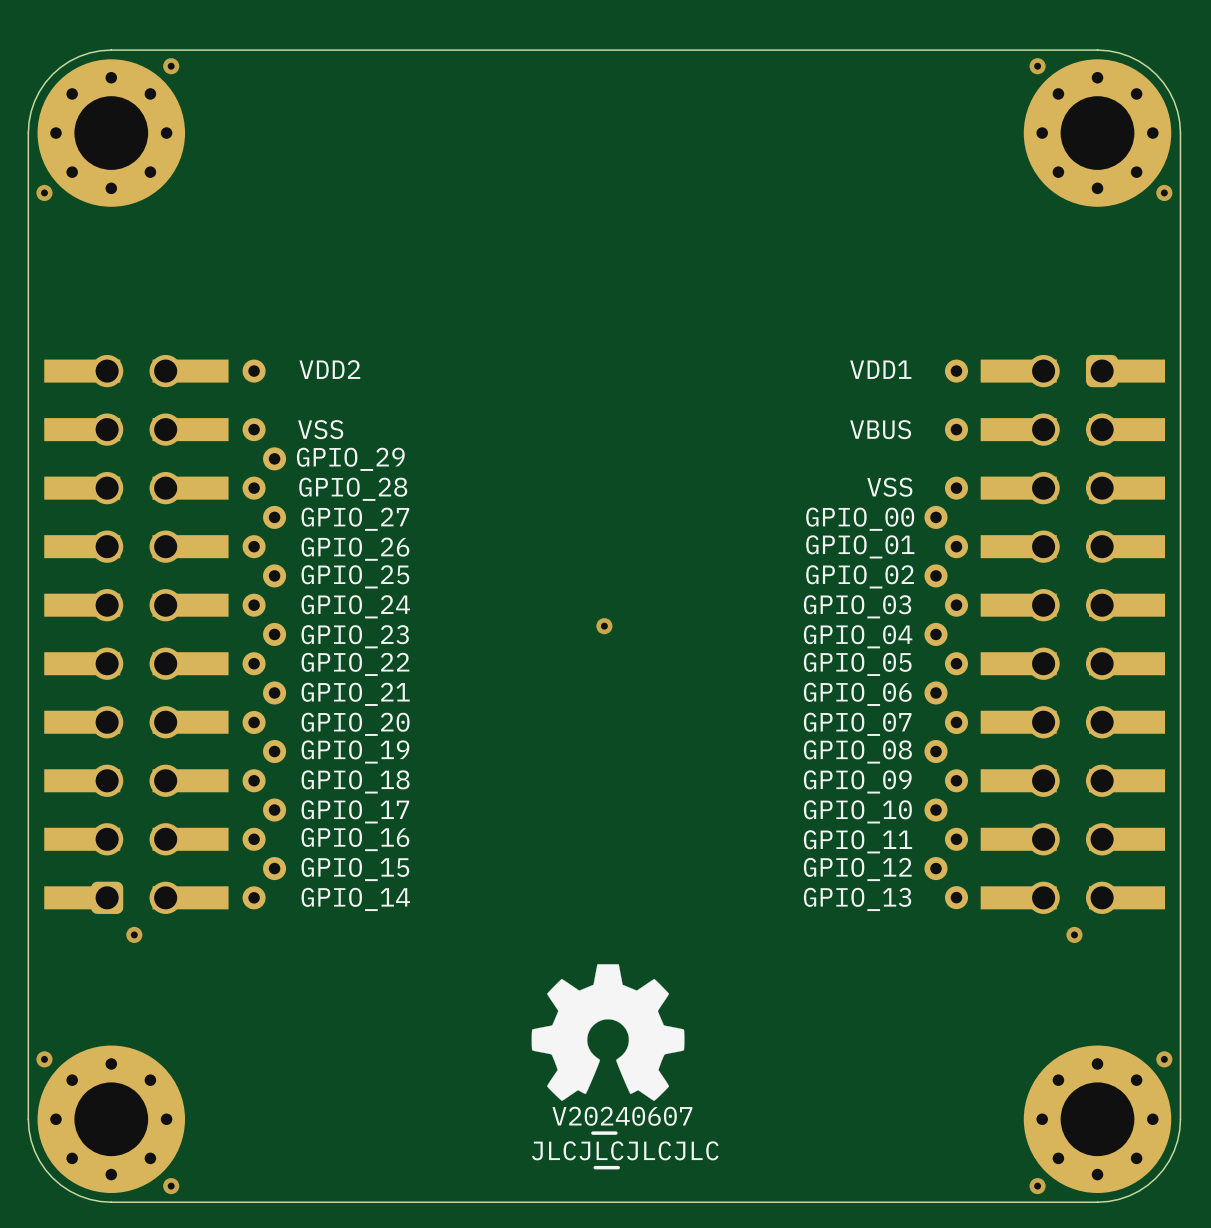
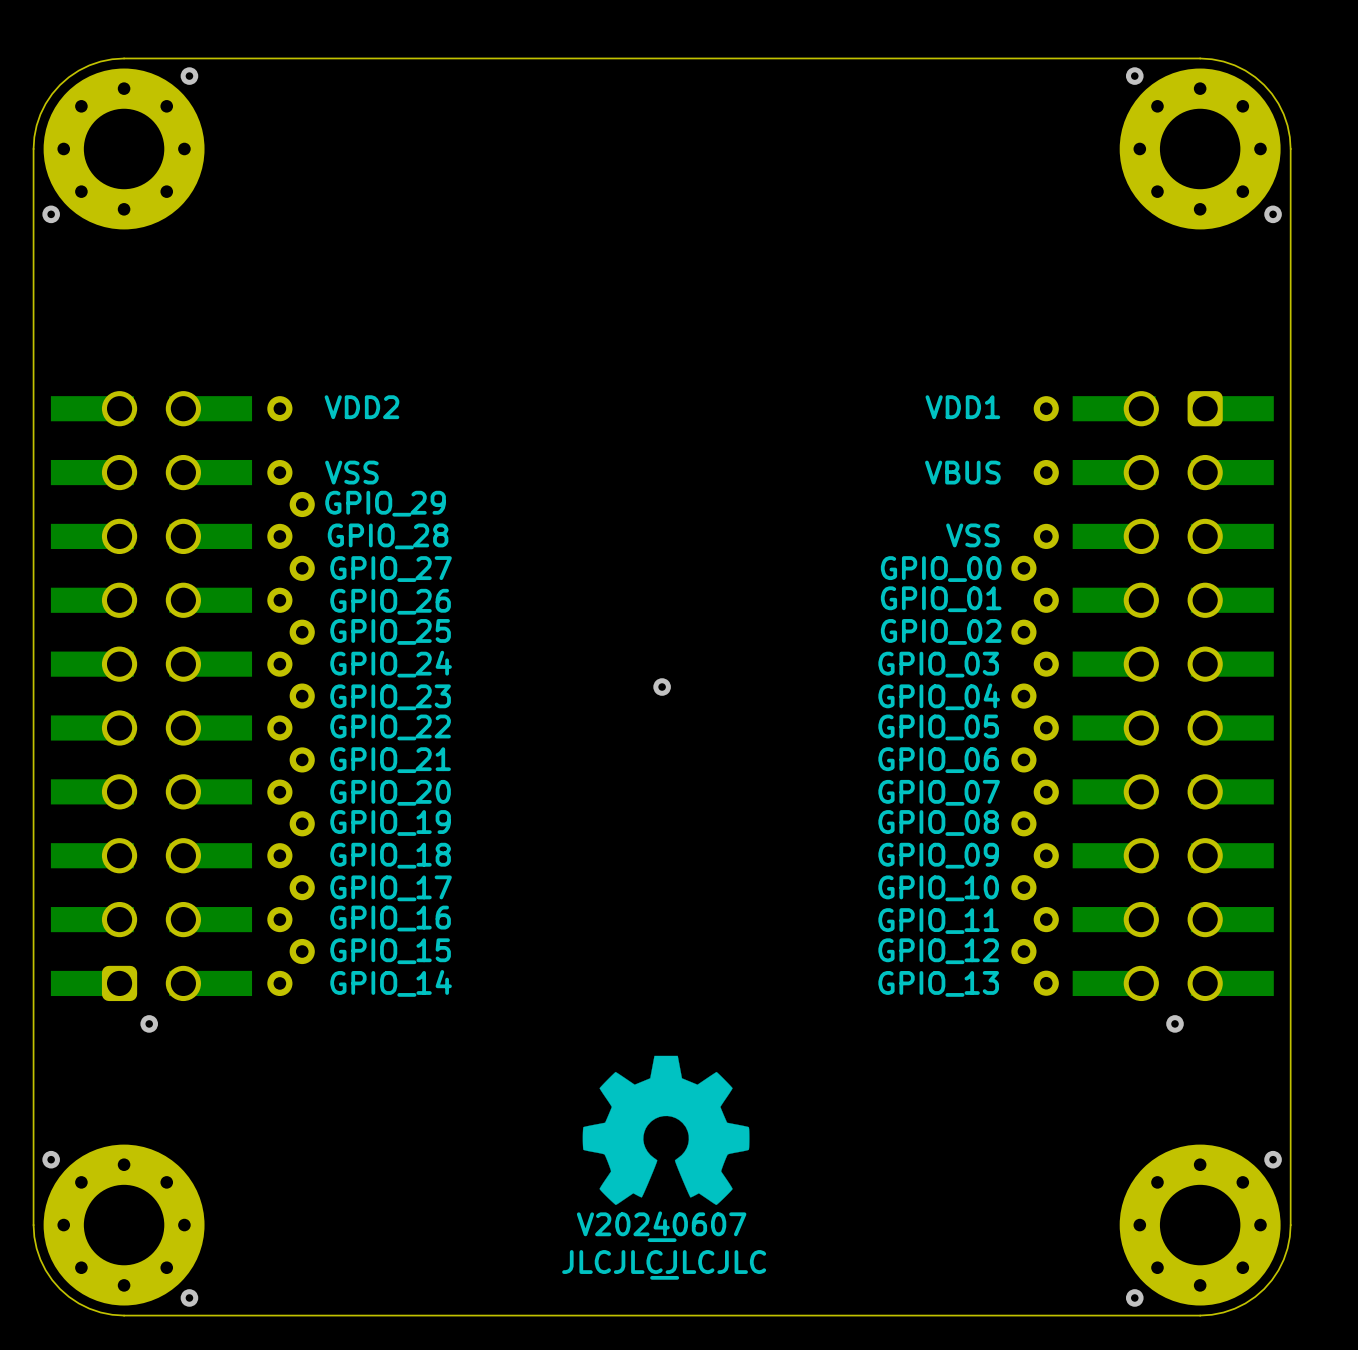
drawing shape: [552, 1106, 693, 1135] -> [576, 1211, 747, 1243]
drawing shape: [532, 1141, 719, 1170] -> [562, 1250, 767, 1280]

